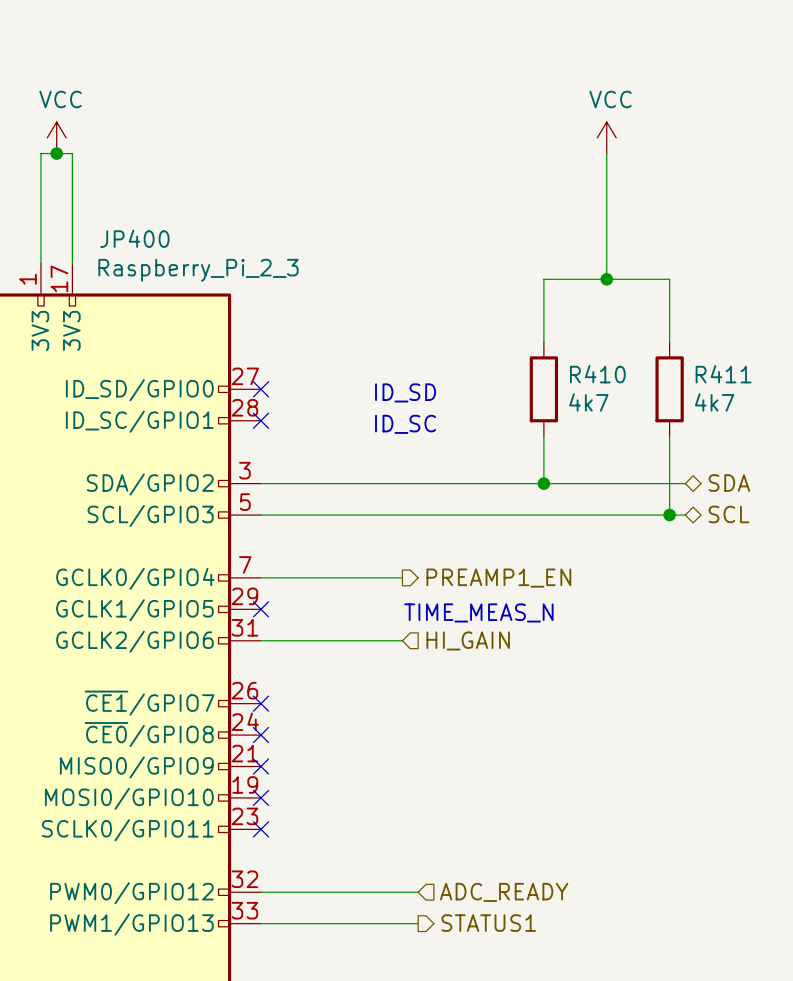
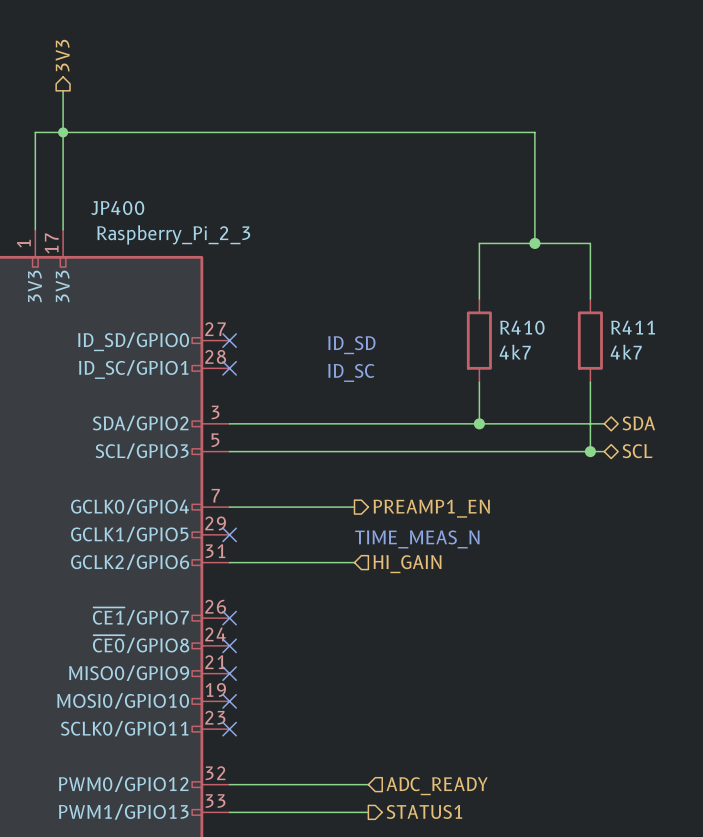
hierarchical label: none -> 3V3 (62, 55)
wire: none -> (63, 90) (63, 132) (534, 132)
power symbol: VCC (56, 137) -> none
power symbol: VCC (606, 137) -> none
junction: (56, 153) -> none
junction: none -> (63, 132)

